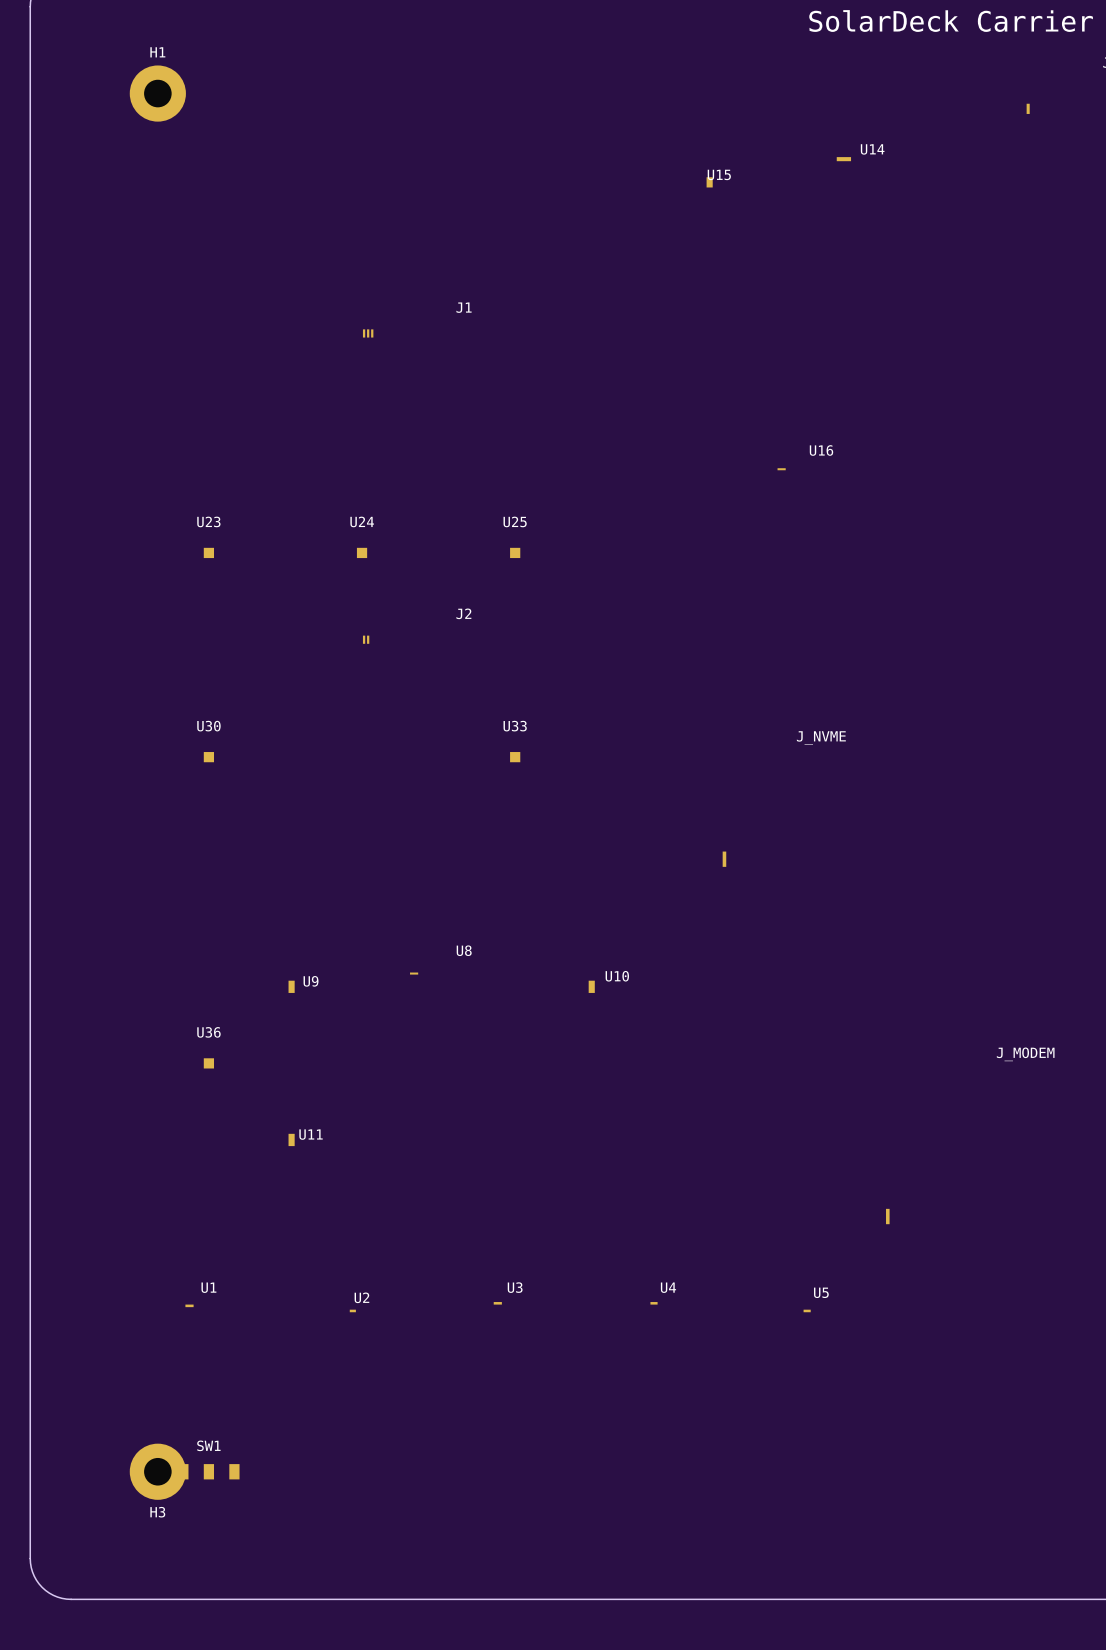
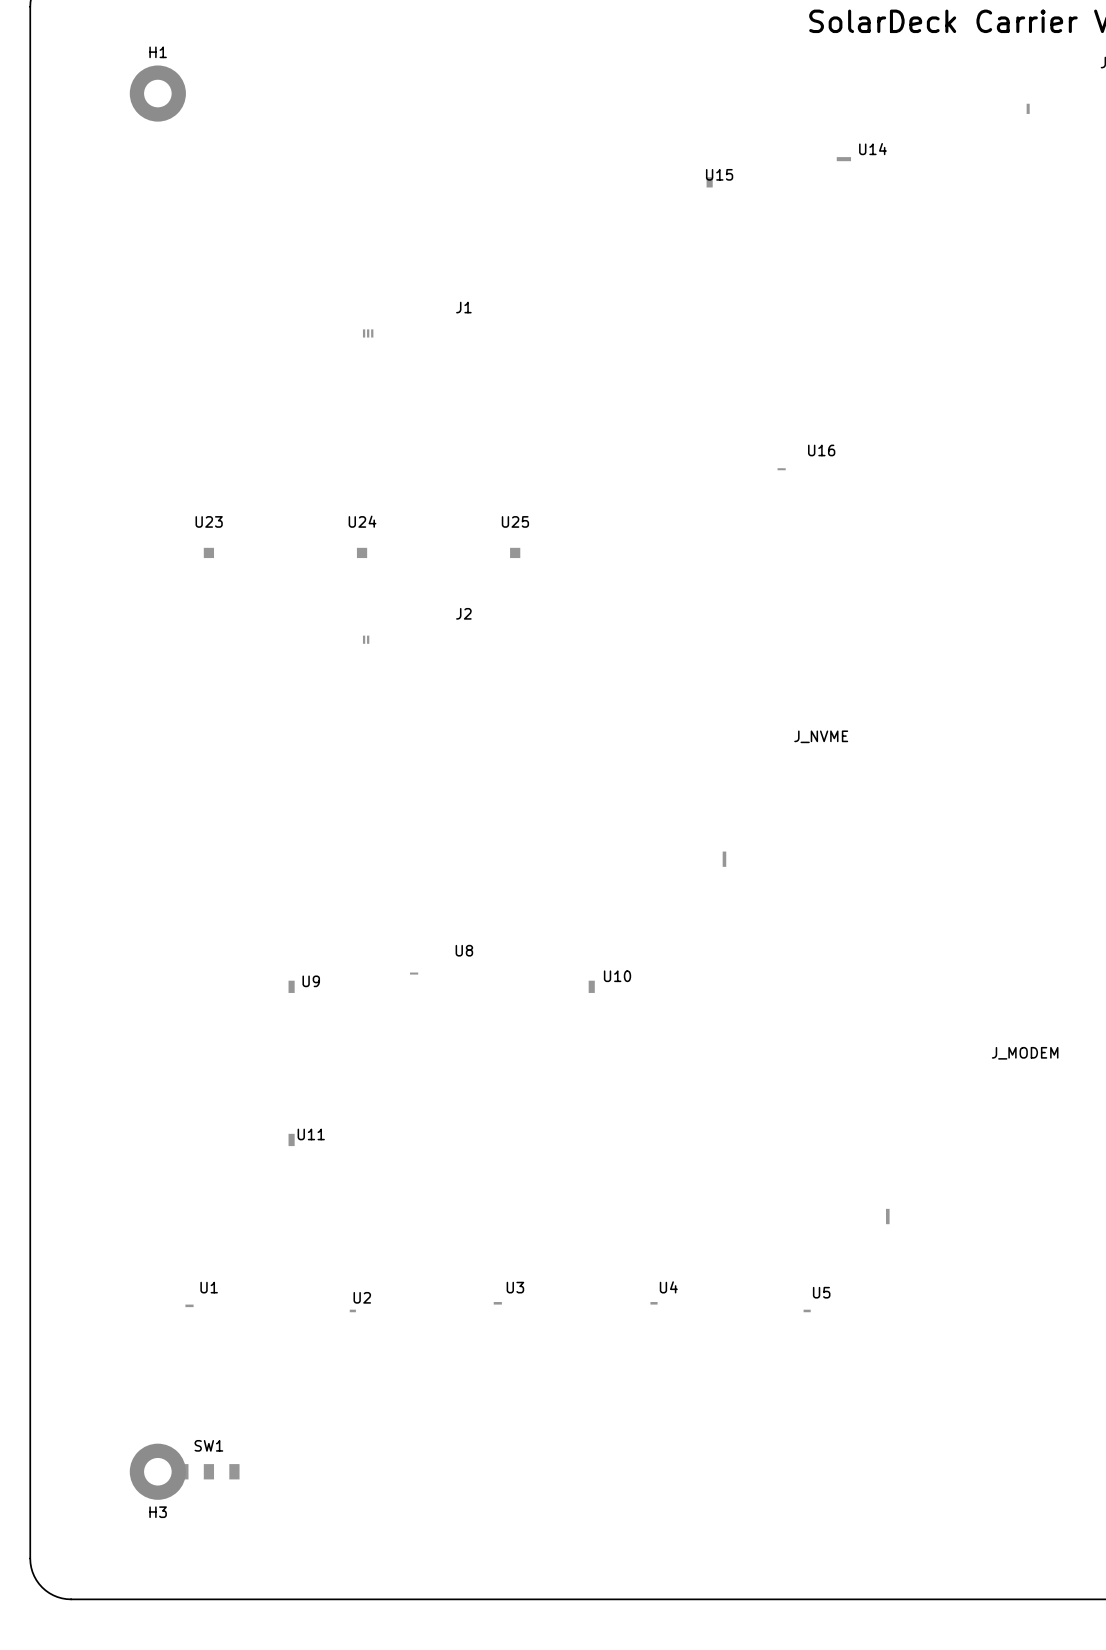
U30: (208, 757) -> none
U33: (515, 757) -> none
U36: (208, 1063) -> none

